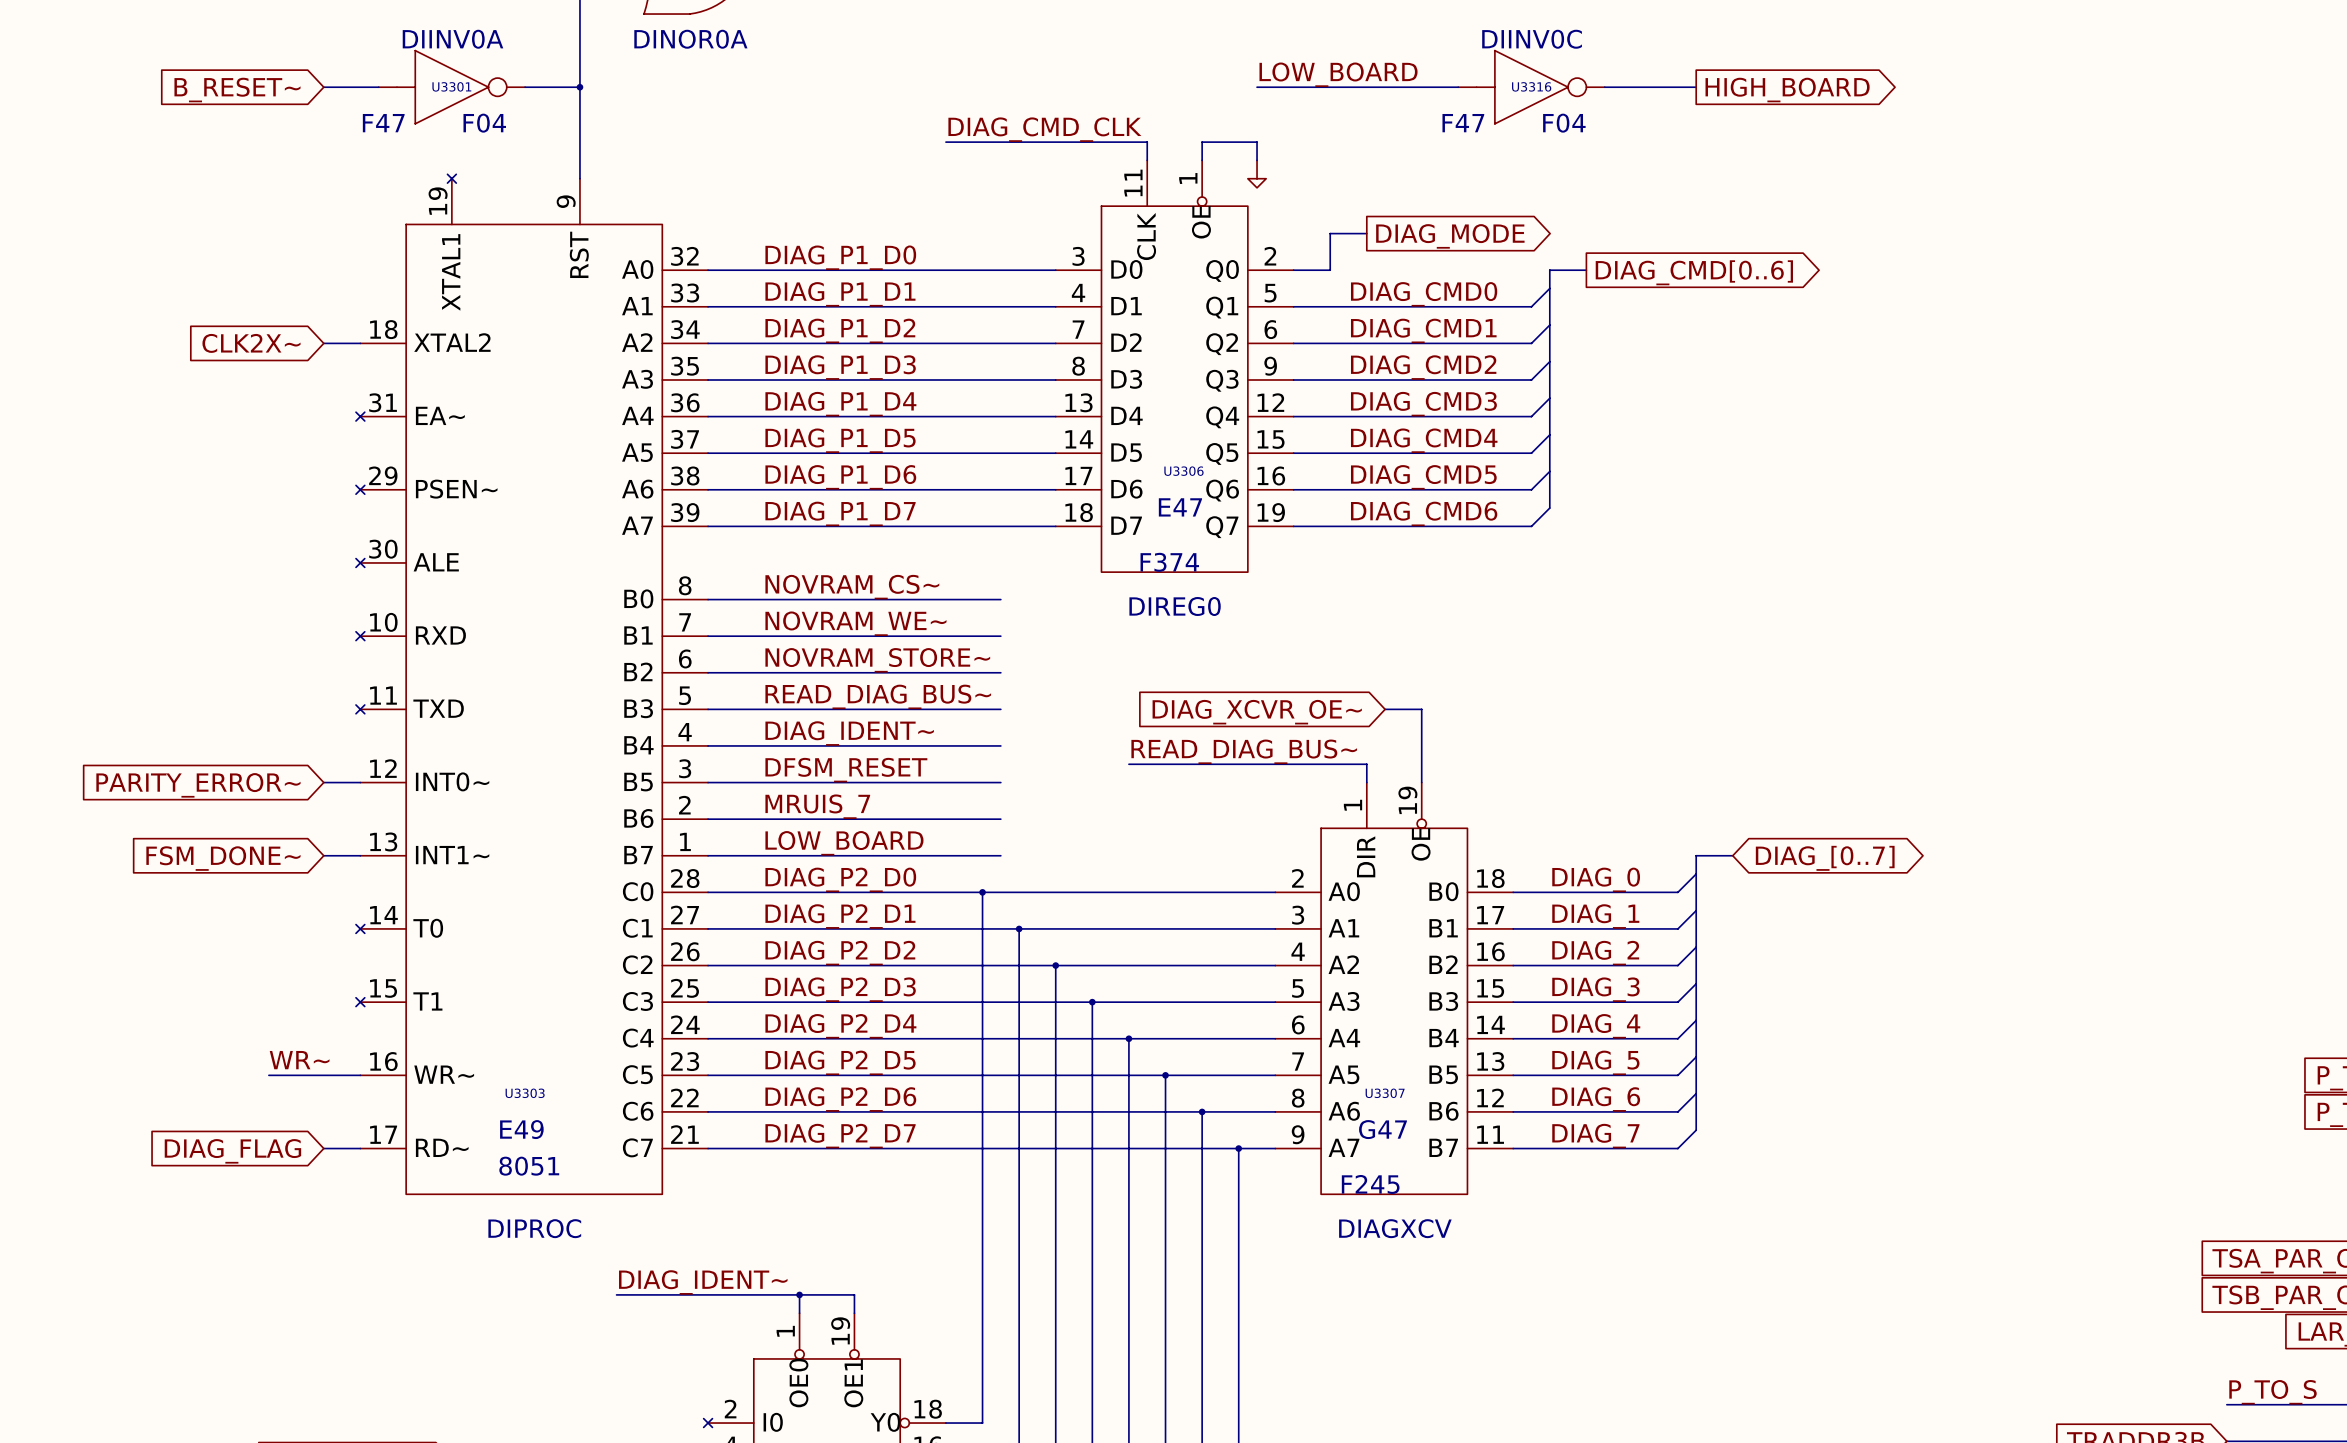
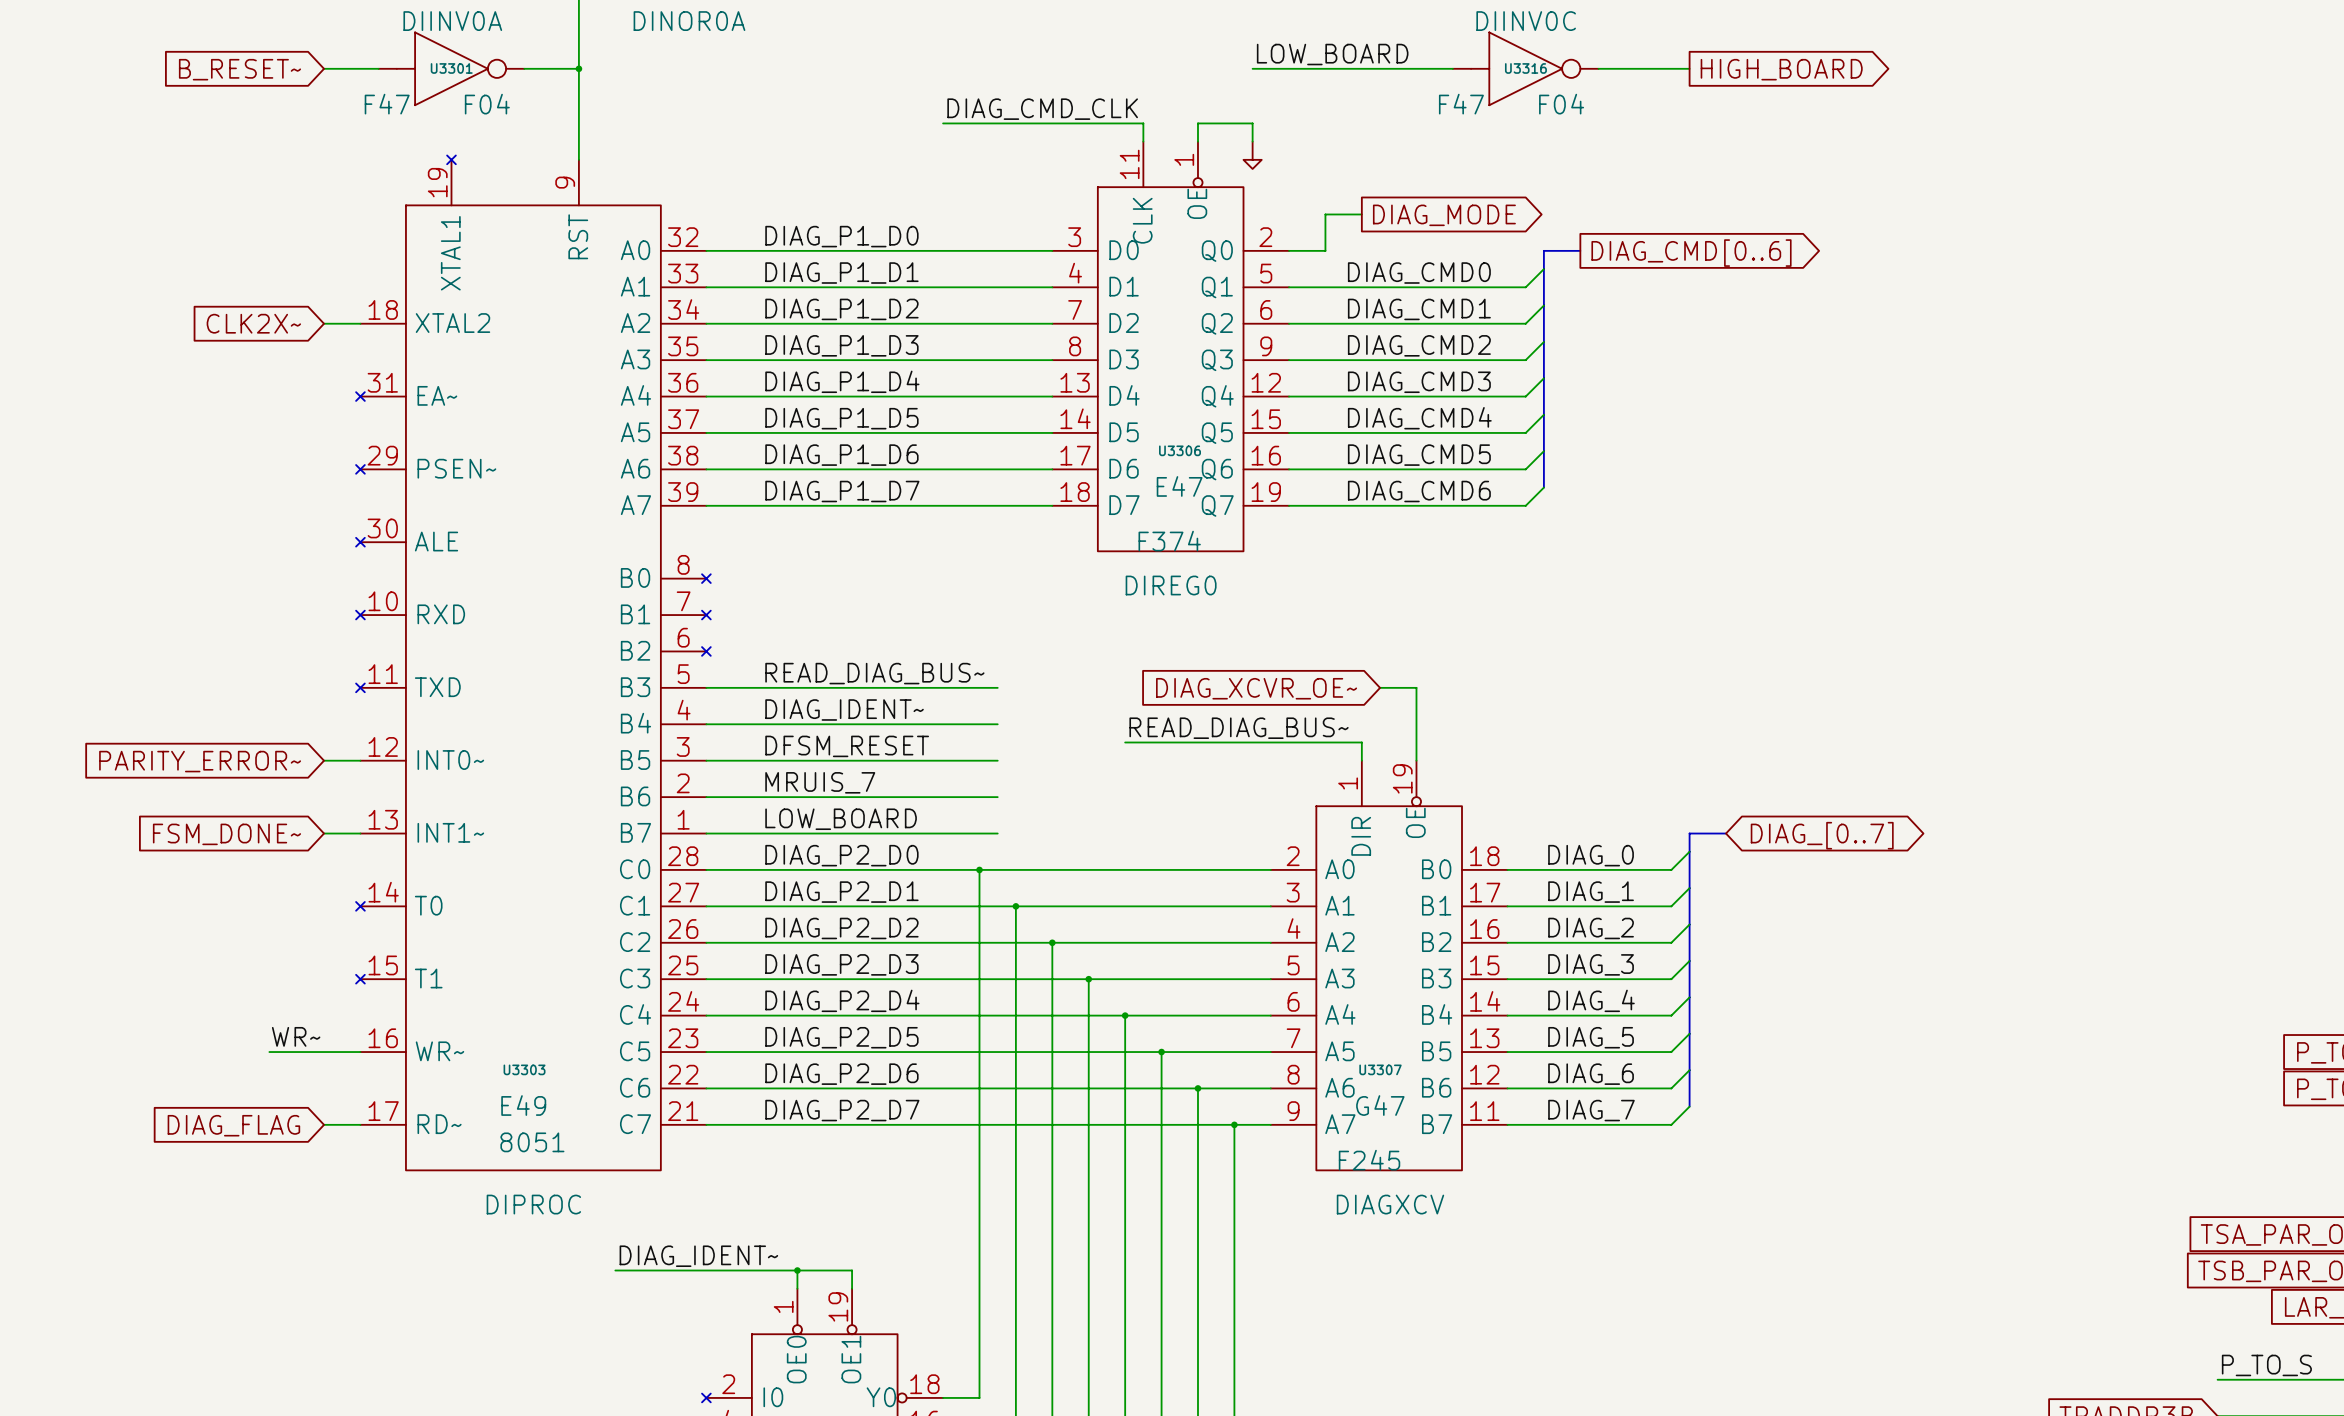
label: NOVRAM_CS~ (852, 587) -> none
wire: (708, 599) (1000, 599) -> none
no-connect mark: none -> (706, 578)
label: NOVRAM_WE~ (855, 623) -> none
wire: (708, 636) (1000, 636) -> none
no-connect mark: none -> (706, 615)
label: NOVRAM_STORE~ (877, 660) -> none
wire: (708, 672) (1000, 672) -> none
no-connect mark: none -> (706, 651)

